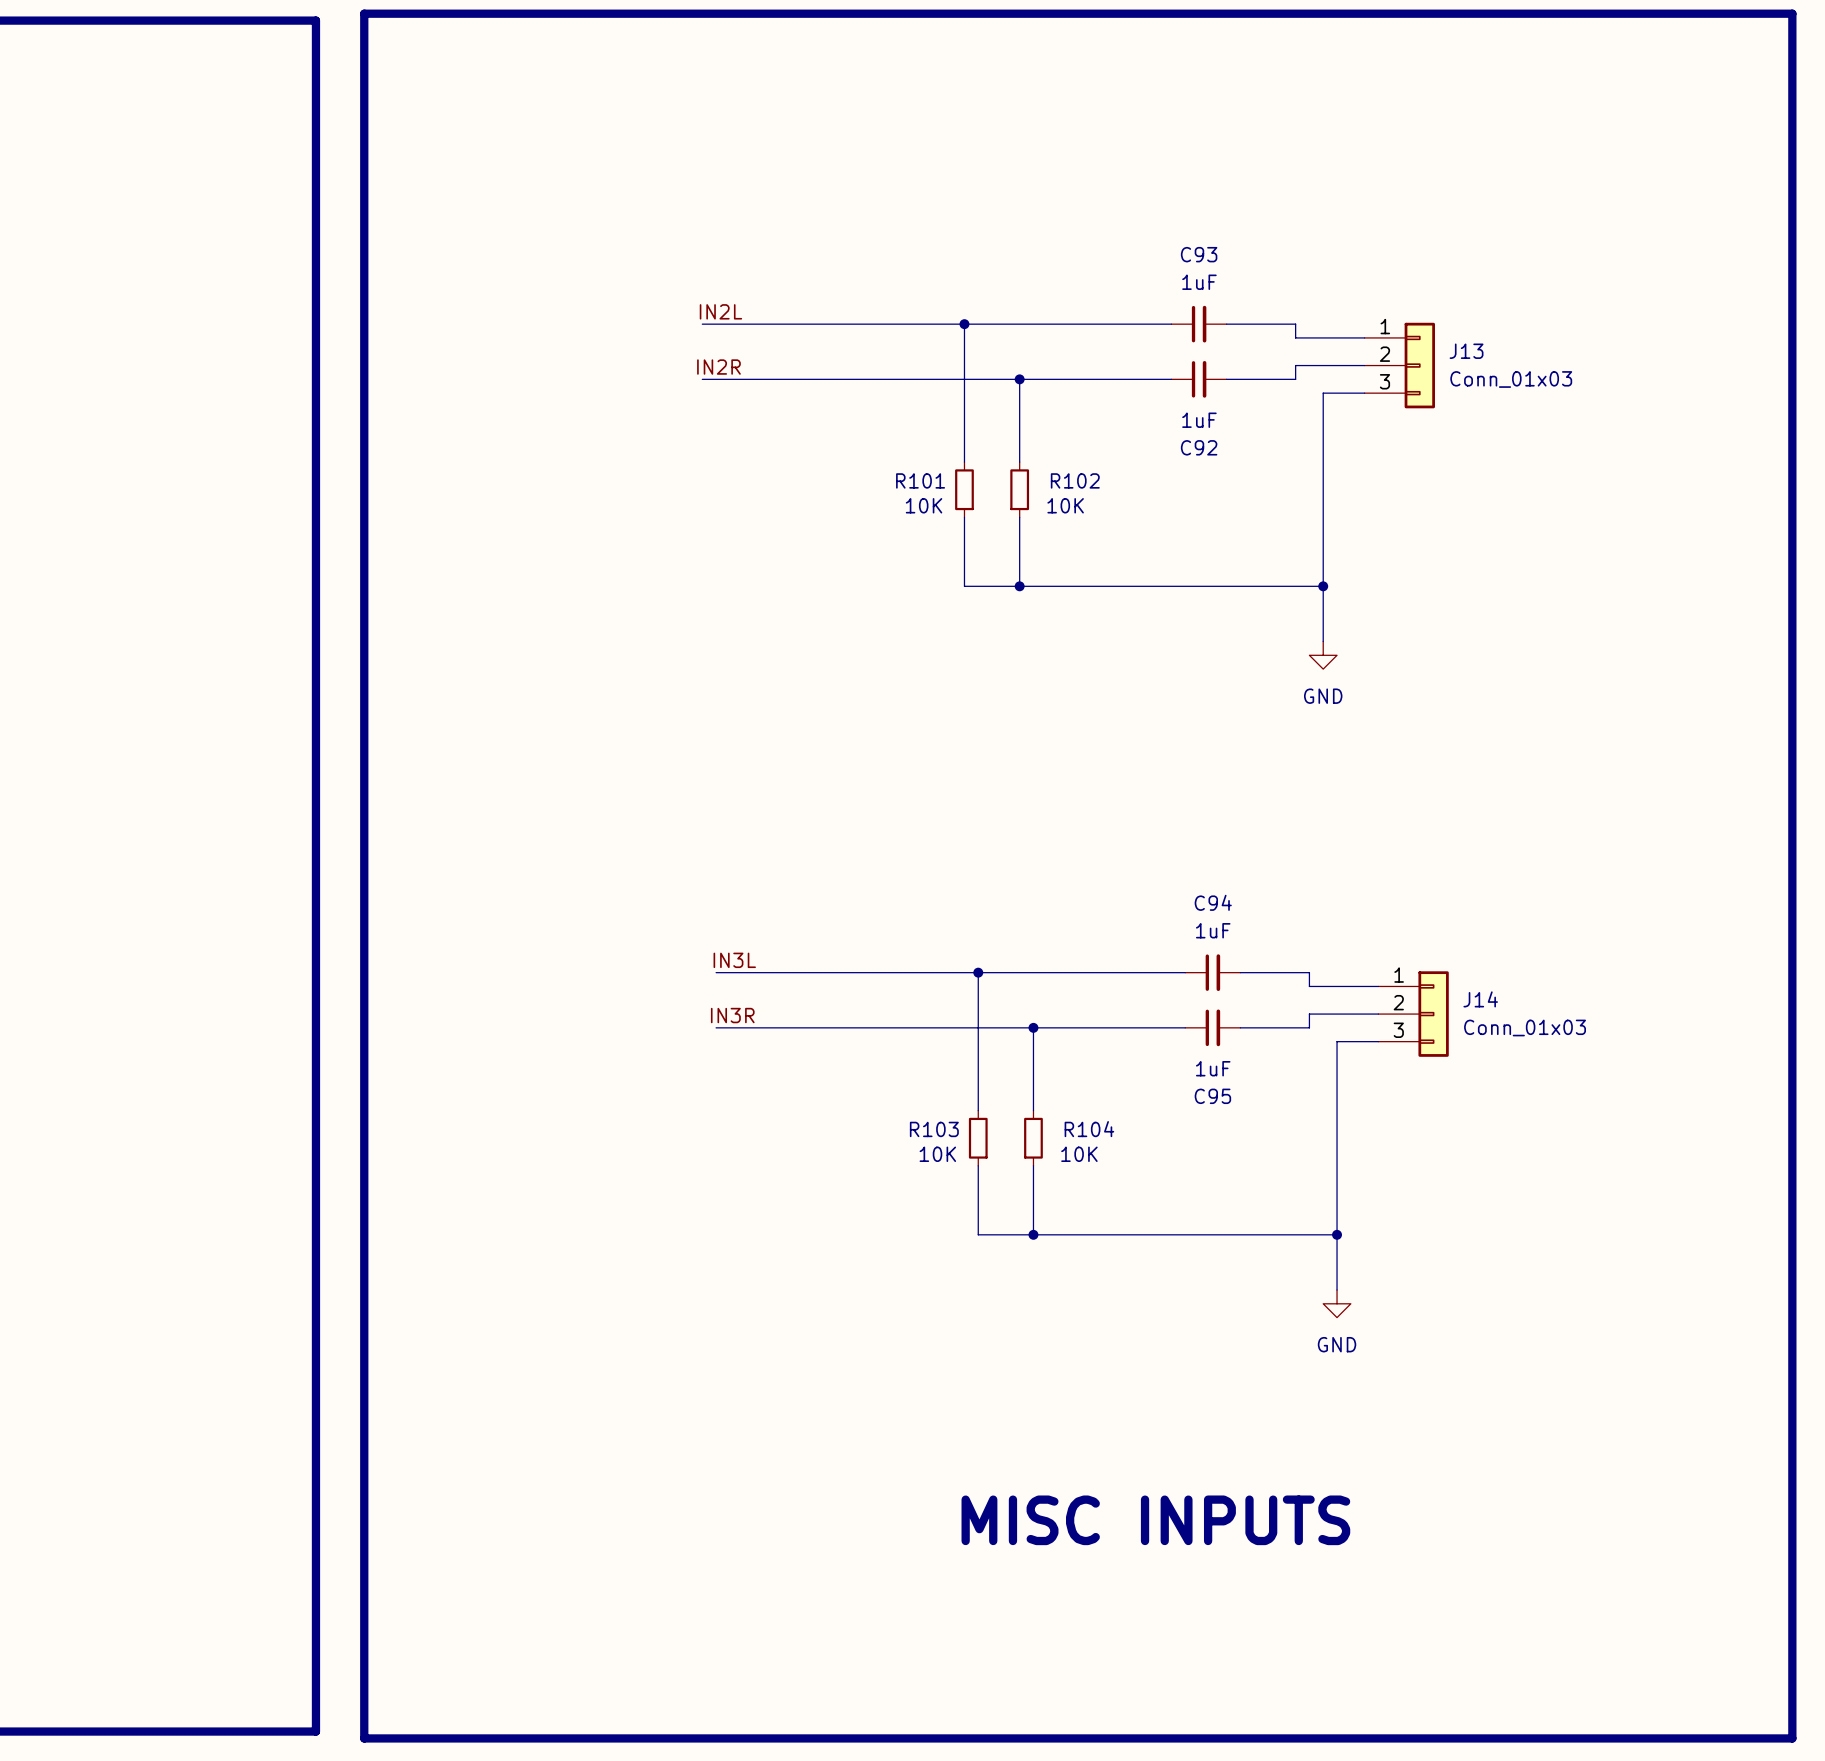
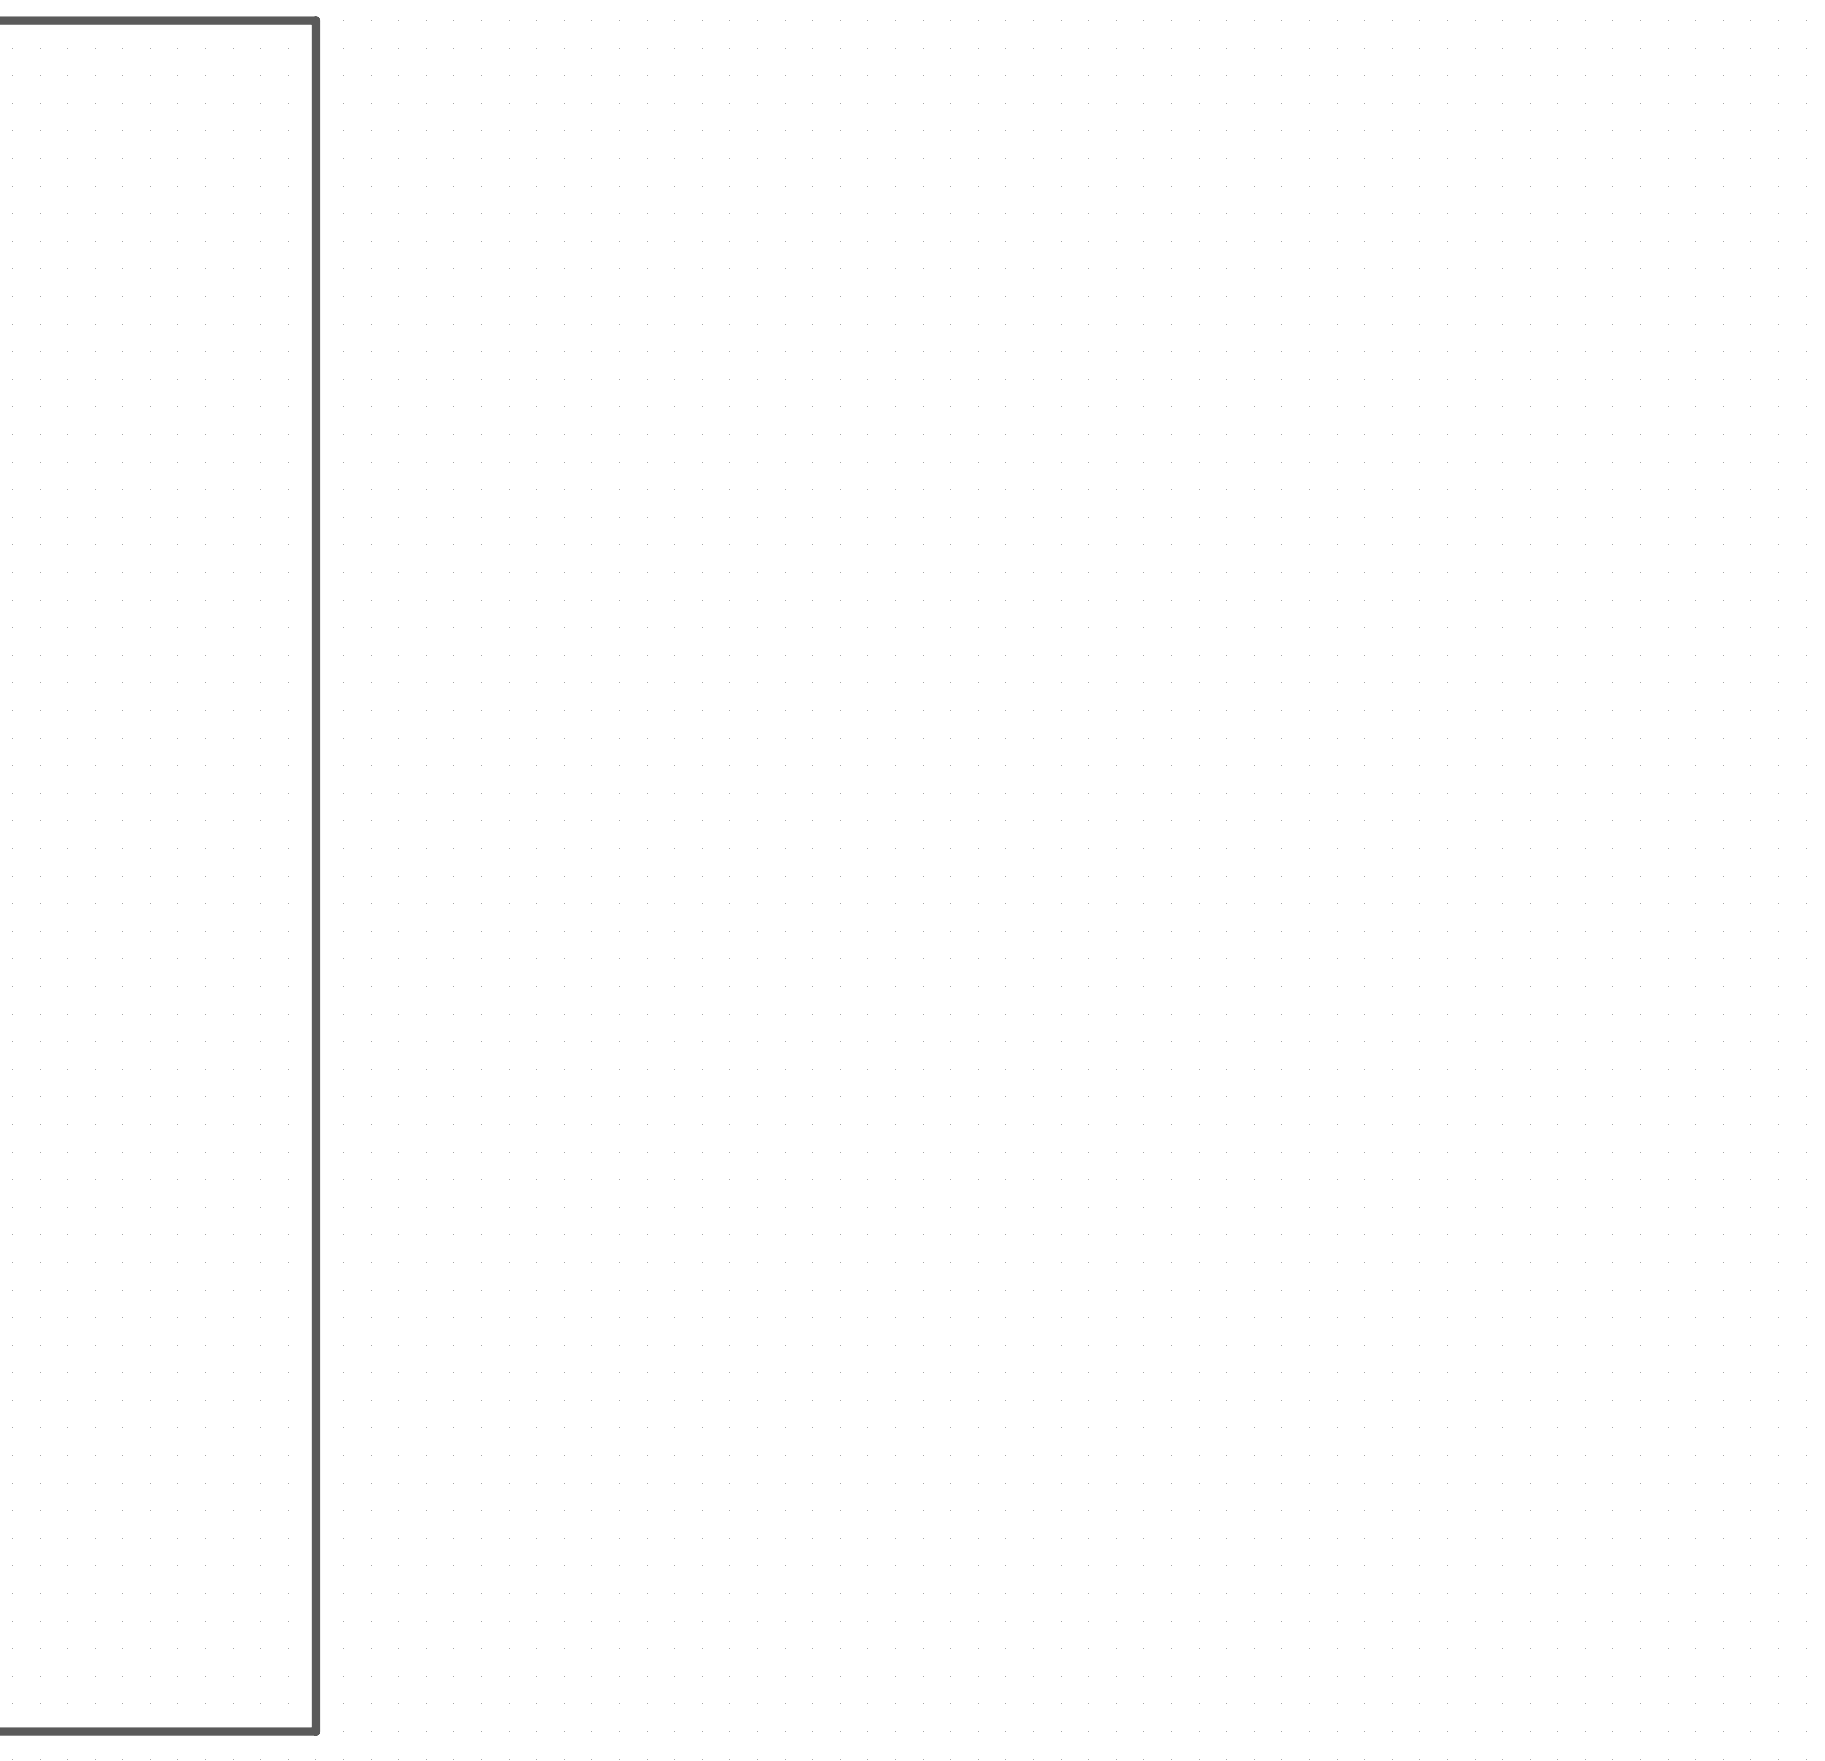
line: (364, 13) (1792, 13) (1792, 1738) (364, 1738) (364, 13) -> none
label: IN2L (720, 311) -> none
wire: (702, 324) (1171, 324) -> none
wire: (964, 324) (964, 462) -> none
junction: (964, 324) -> none
C93: 1uF (1199, 324) -> none
wire: (1226, 324) (1295, 324) (1295, 337) (1364, 337) -> none
wire: (1364, 365) (1295, 365) (1295, 379) (1226, 379) -> none
J13: Conn_01x03 (1399, 365) -> none
label: IN2R (718, 367) -> none
wire: (702, 379) (1171, 379) -> none
wire: (1019, 379) (1019, 462) -> none
junction: (1019, 379) -> none
C92: 1uF (1199, 379) -> none
wire: (1364, 393) (1323, 393) (1323, 641) -> none
R101: 10K (964, 489) -> none
R102: 10K (1019, 489) -> none
wire: (964, 517) (964, 586) (1323, 586) -> none
wire: (1019, 517) (1019, 586) -> none
junction: (1019, 586) -> none
junction: (1323, 586) -> none
power symbol: GND (1323, 655) -> none
label: IN3L (734, 960) -> none
wire: (716, 972) (1185, 972) -> none
wire: (978, 972) (978, 1110) -> none
junction: (978, 972) -> none
C94: 1uF (1212, 972) -> none
wire: (1240, 972) (1309, 972) (1309, 986) (1378, 986) -> none
wire: (1378, 1014) (1309, 1014) (1309, 1027) (1240, 1027) -> none
J14: Conn_01x03 (1413, 1014) -> none
label: IN3R (732, 1015) -> none
wire: (716, 1027) (1185, 1027) -> none
wire: (1033, 1027) (1033, 1110) -> none
junction: (1033, 1027) -> none
C95: 1uF (1212, 1027) -> none
wire: (1378, 1041) (1337, 1041) (1337, 1290) -> none
R103: 10K (978, 1138) -> none
R104: 10K (1033, 1138) -> none
wire: (978, 1165) (978, 1234) (1337, 1234) -> none
wire: (1033, 1165) (1033, 1234) -> none
junction: (1033, 1234) -> none
junction: (1337, 1234) -> none
power symbol: GND (1337, 1303) -> none
text: MISC INPUTS (1155, 1520) -> none

